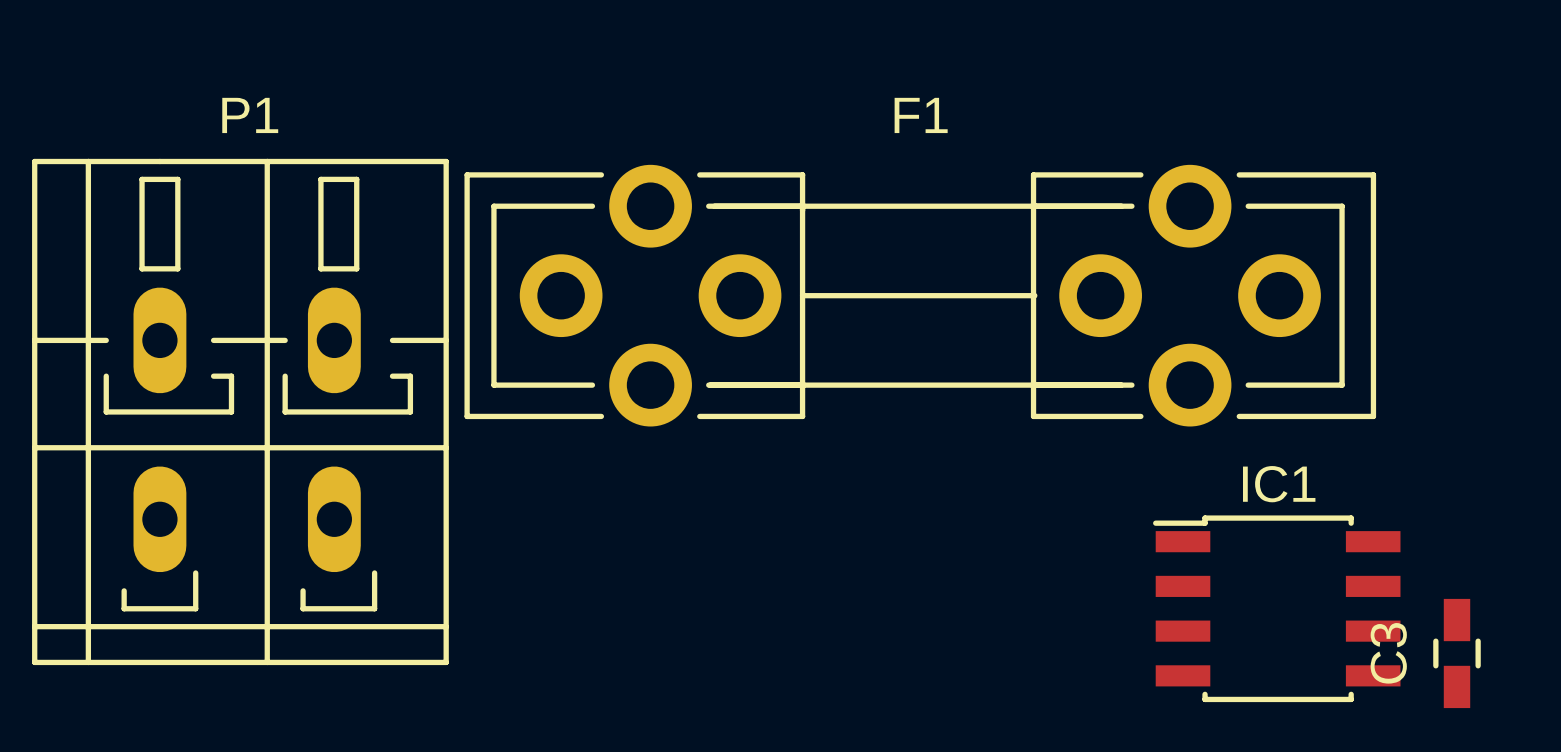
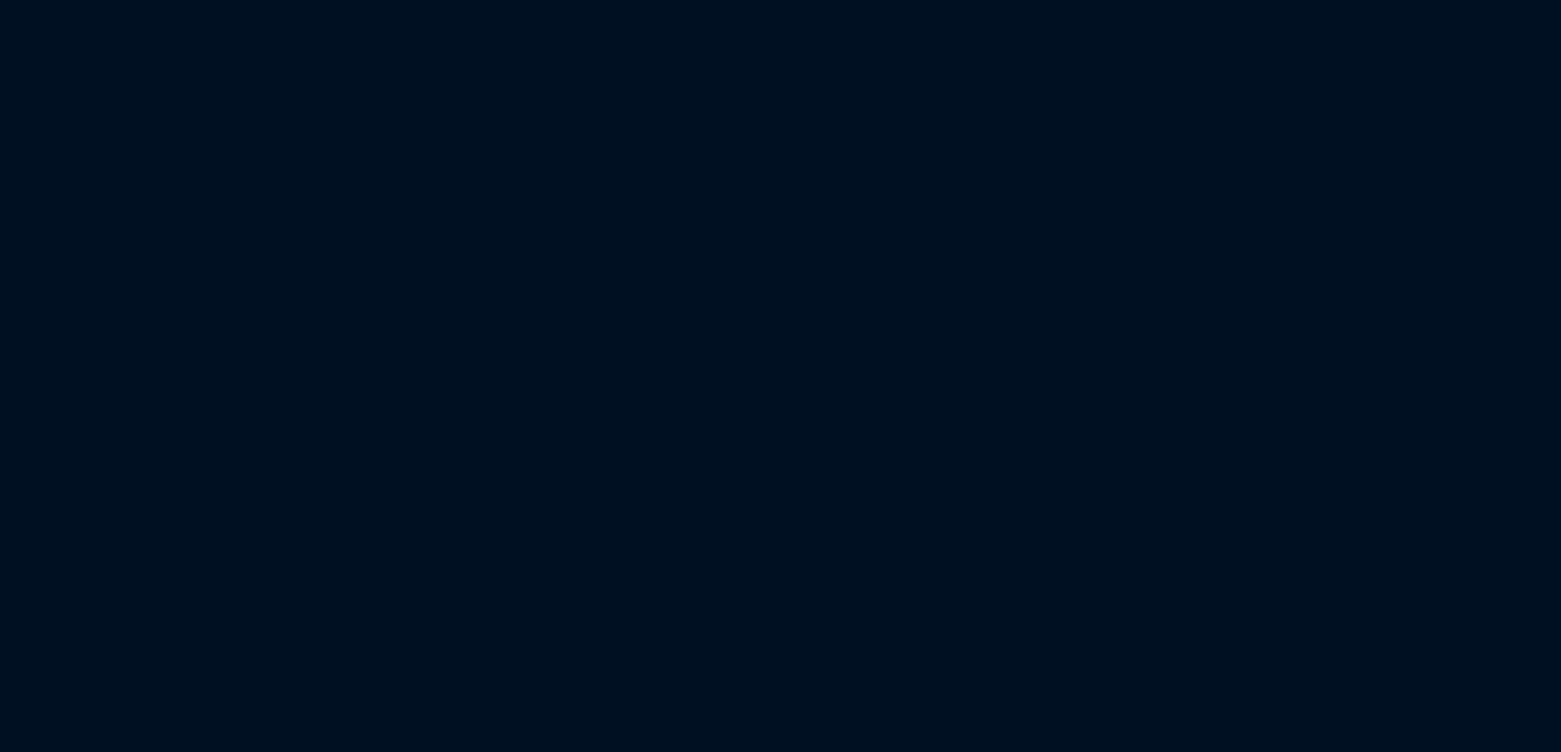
F1: (920, 295) -> none
P1: (240, 411) -> none
IC1: (1276, 608) -> none
C3: (1457, 653) -> none

